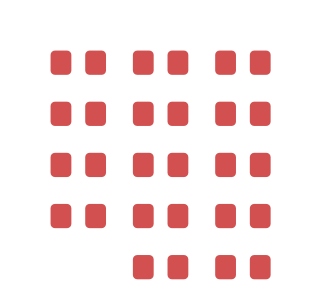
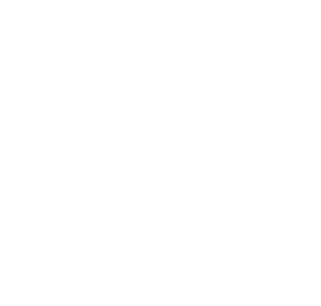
part: (78, 62) -> none
part: (160, 62) -> none
part: (242, 62) -> none
part: (78, 113) -> none
part: (160, 113) -> none
part: (242, 113) -> none
part: (78, 164) -> none
part: (160, 164) -> none
part: (242, 164) -> none
part: (78, 216) -> none
part: (160, 216) -> none
part: (242, 216) -> none
part: (160, 267) -> none
part: (242, 267) -> none

